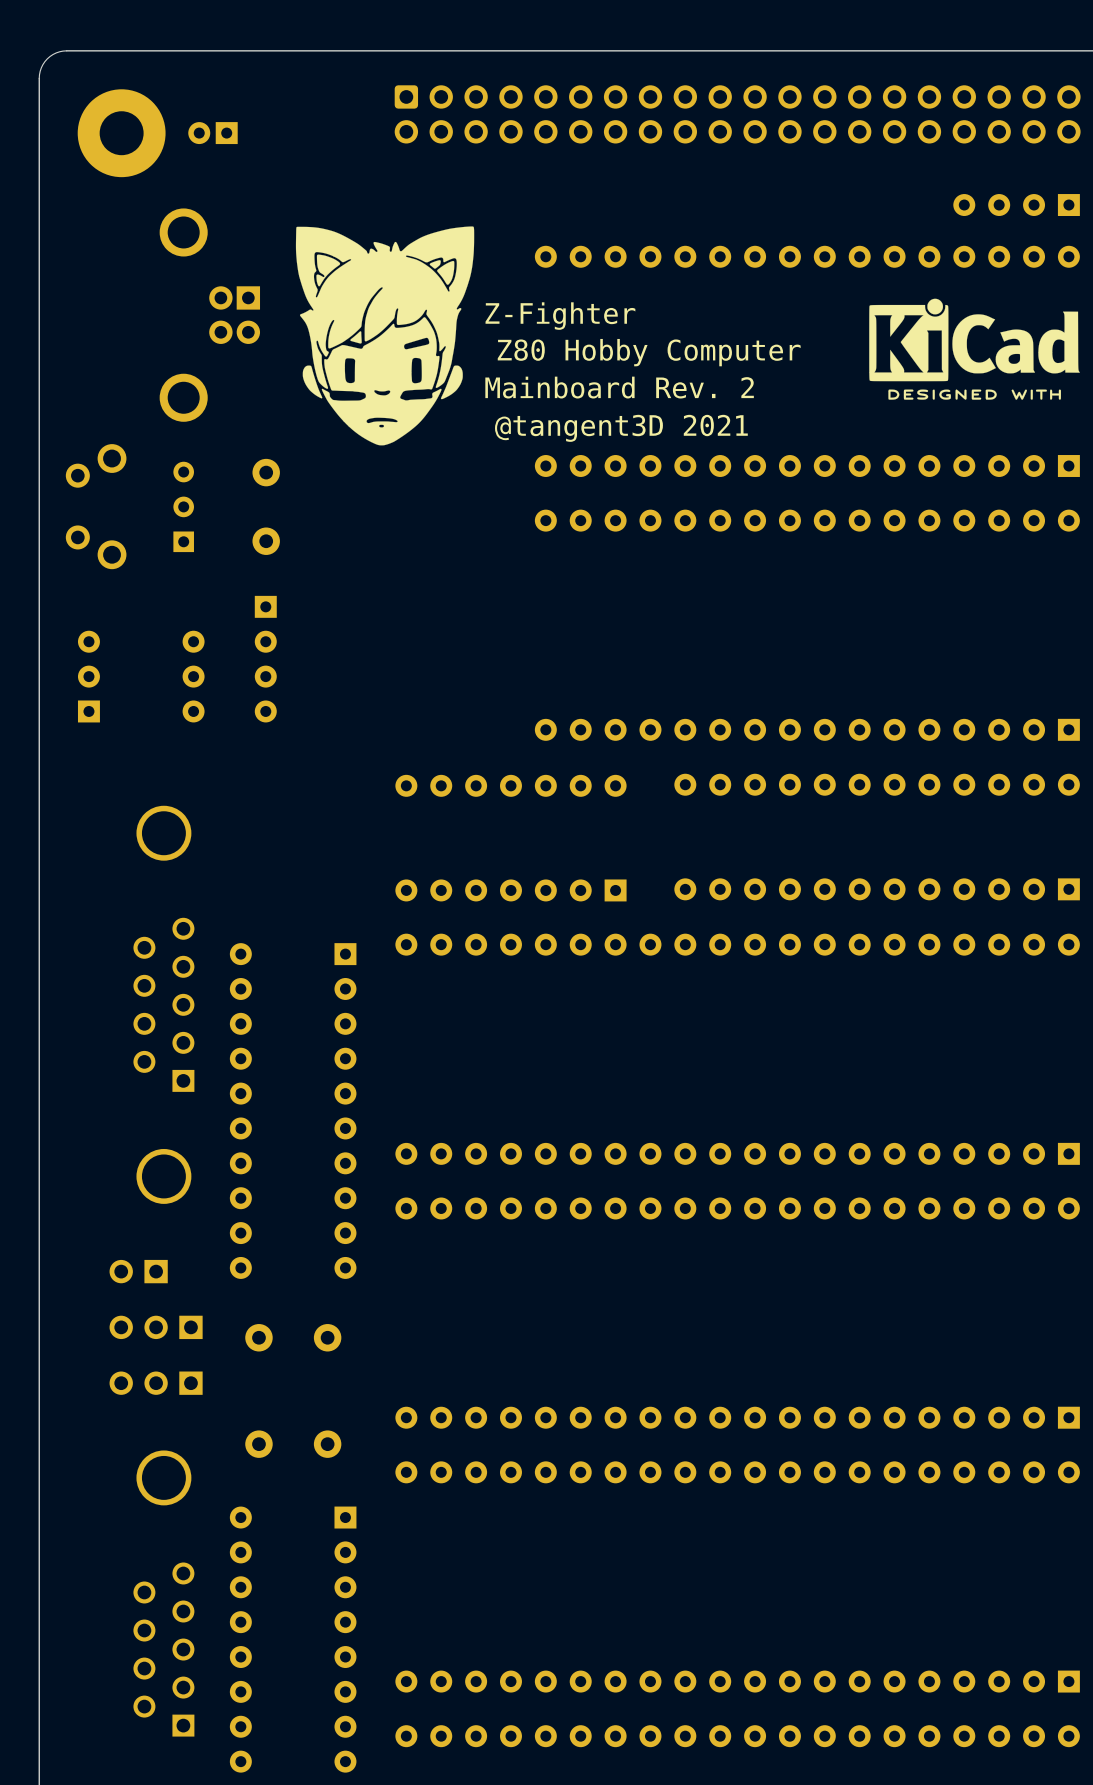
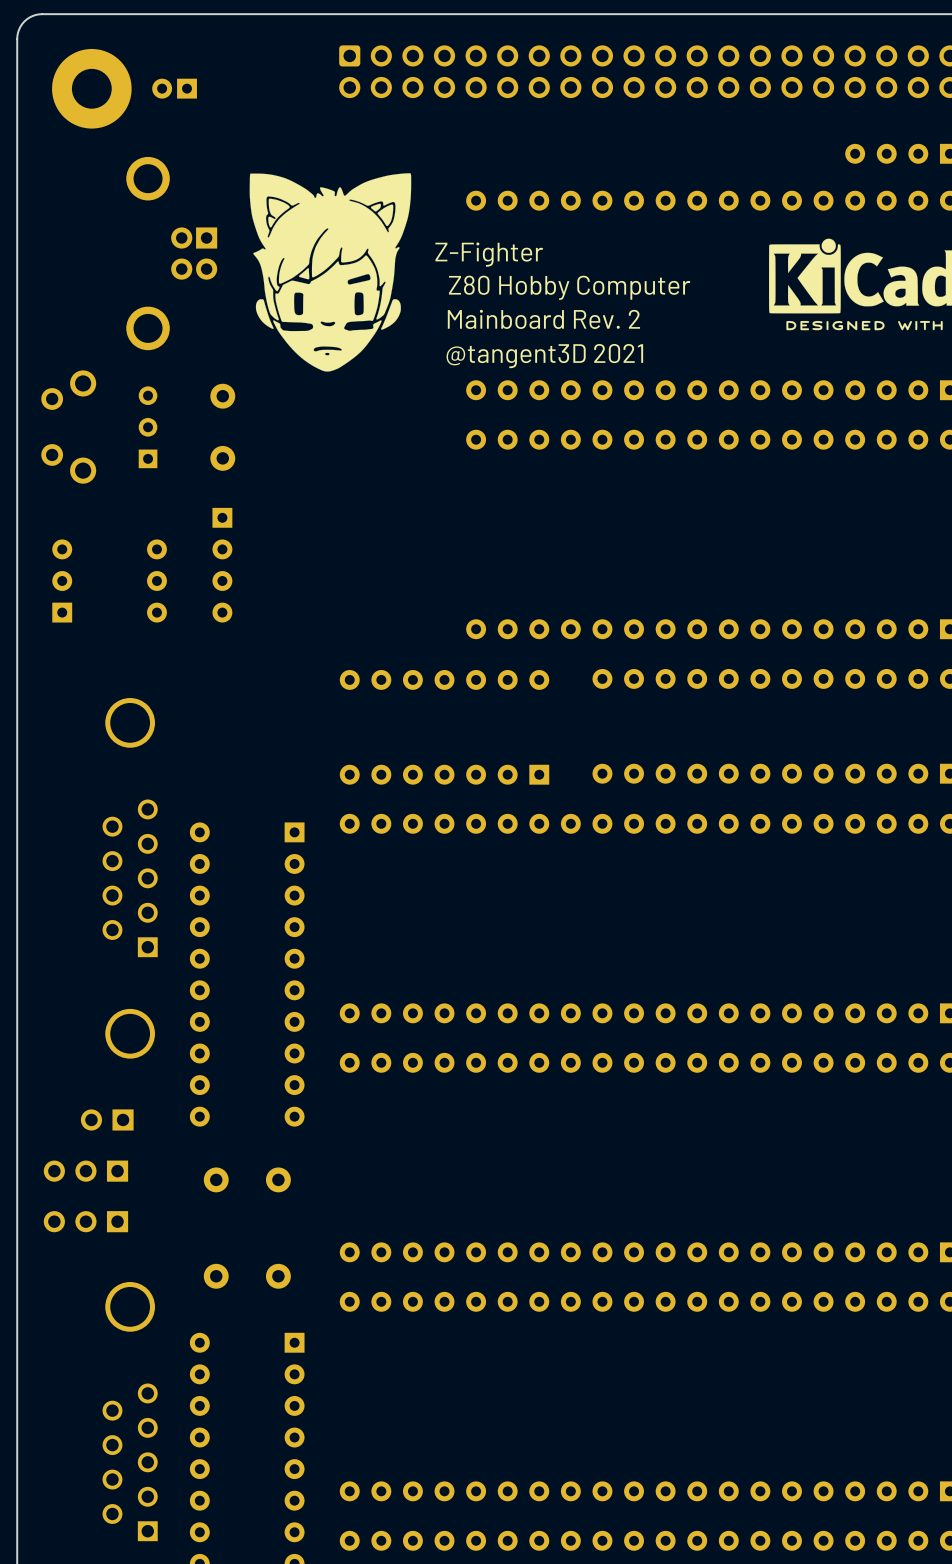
part: (156, 1327) -> none
part: none -> (85, 1171)
part: none -> (85, 1221)
part: (156, 1383) -> none

